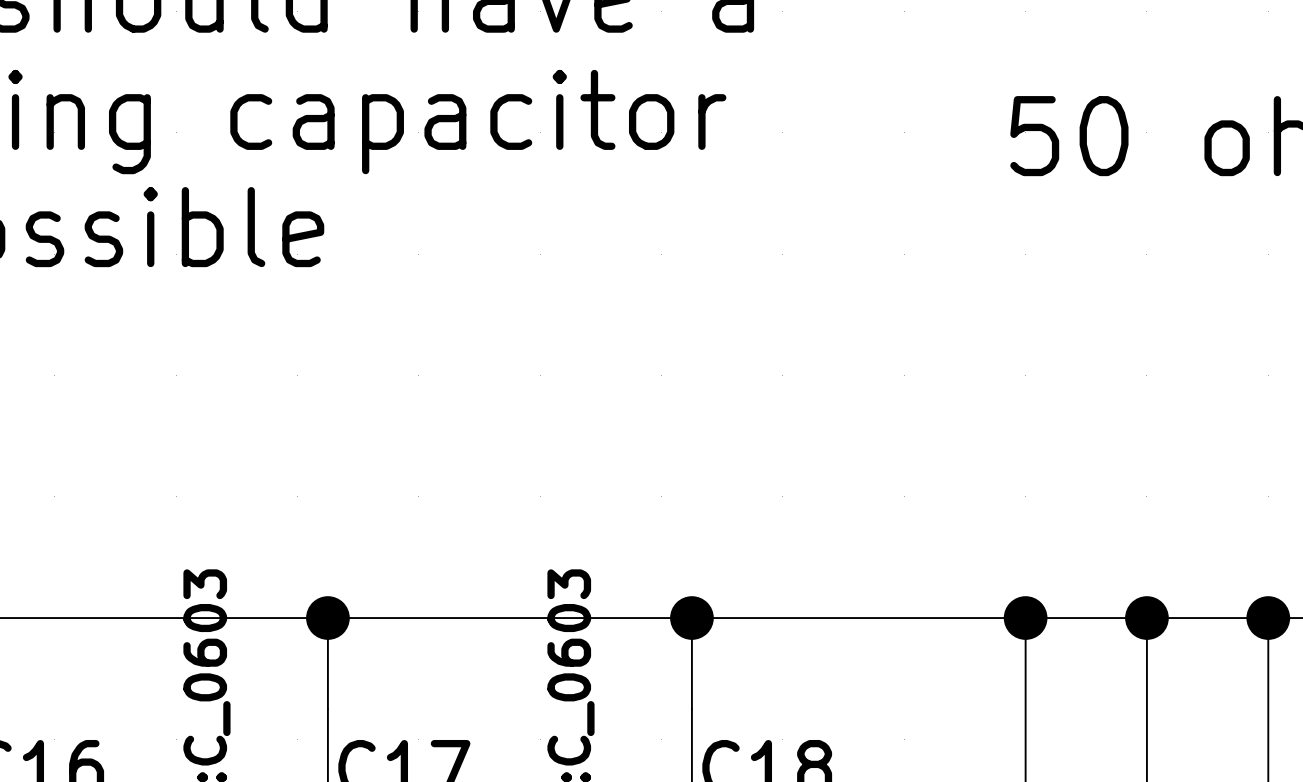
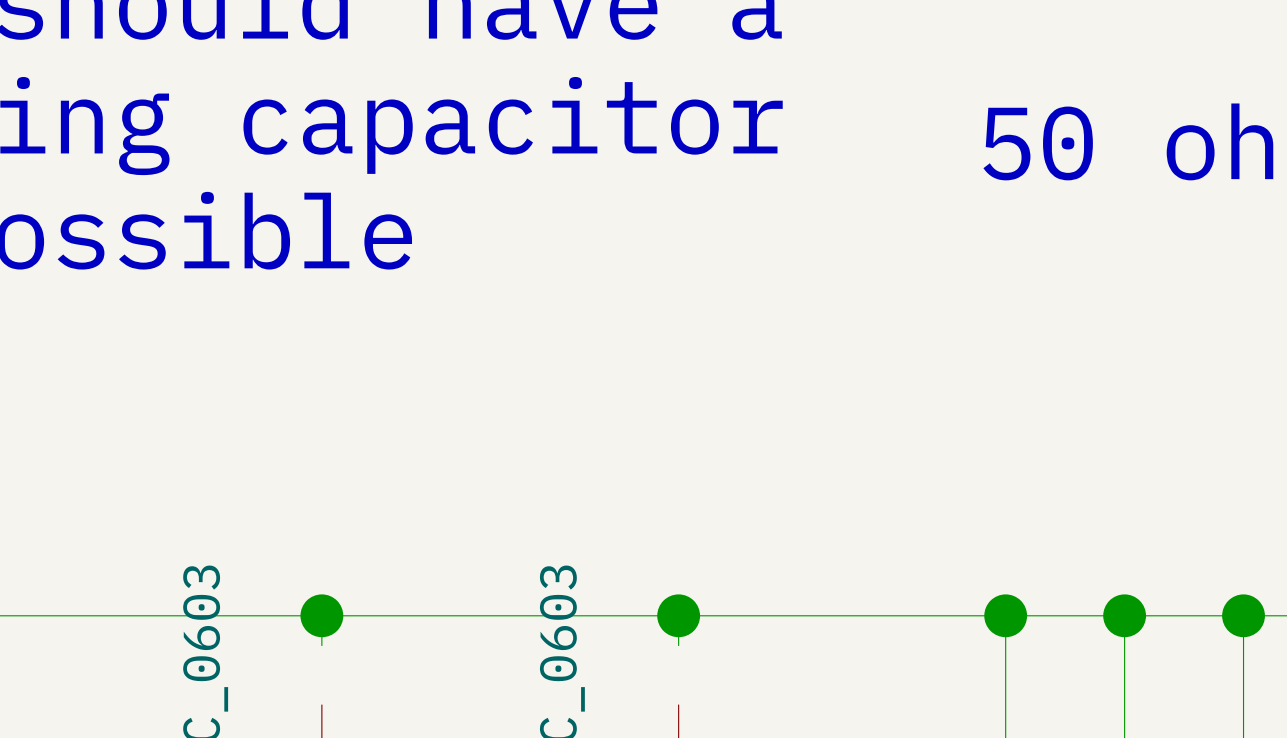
wire: (327, 648) (327, 709) -> none
wire: (691, 648) (691, 709) -> none

